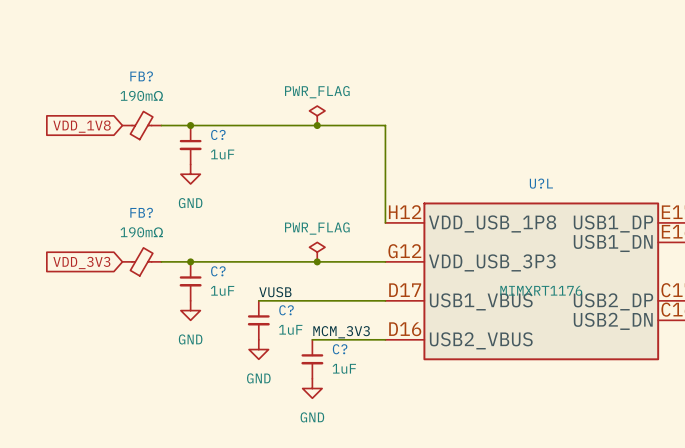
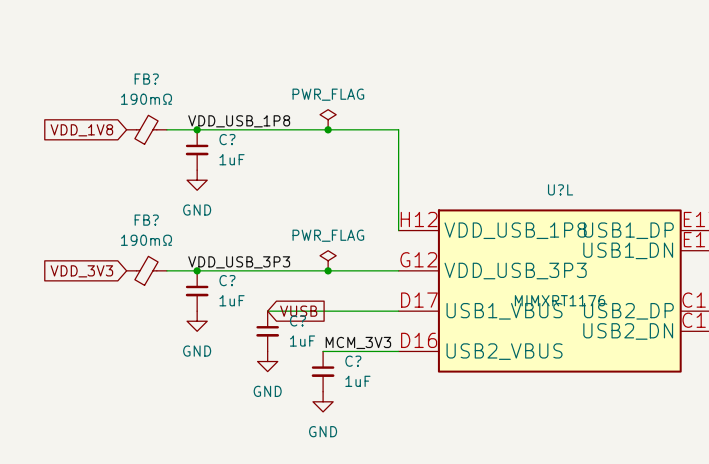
label: none -> VDD_USB_1P8 (239, 121)
label: none -> VDD_USB_3P3 (239, 262)
label: VUSB (275, 292) -> none
global label: none -> VUSB (298, 311)

